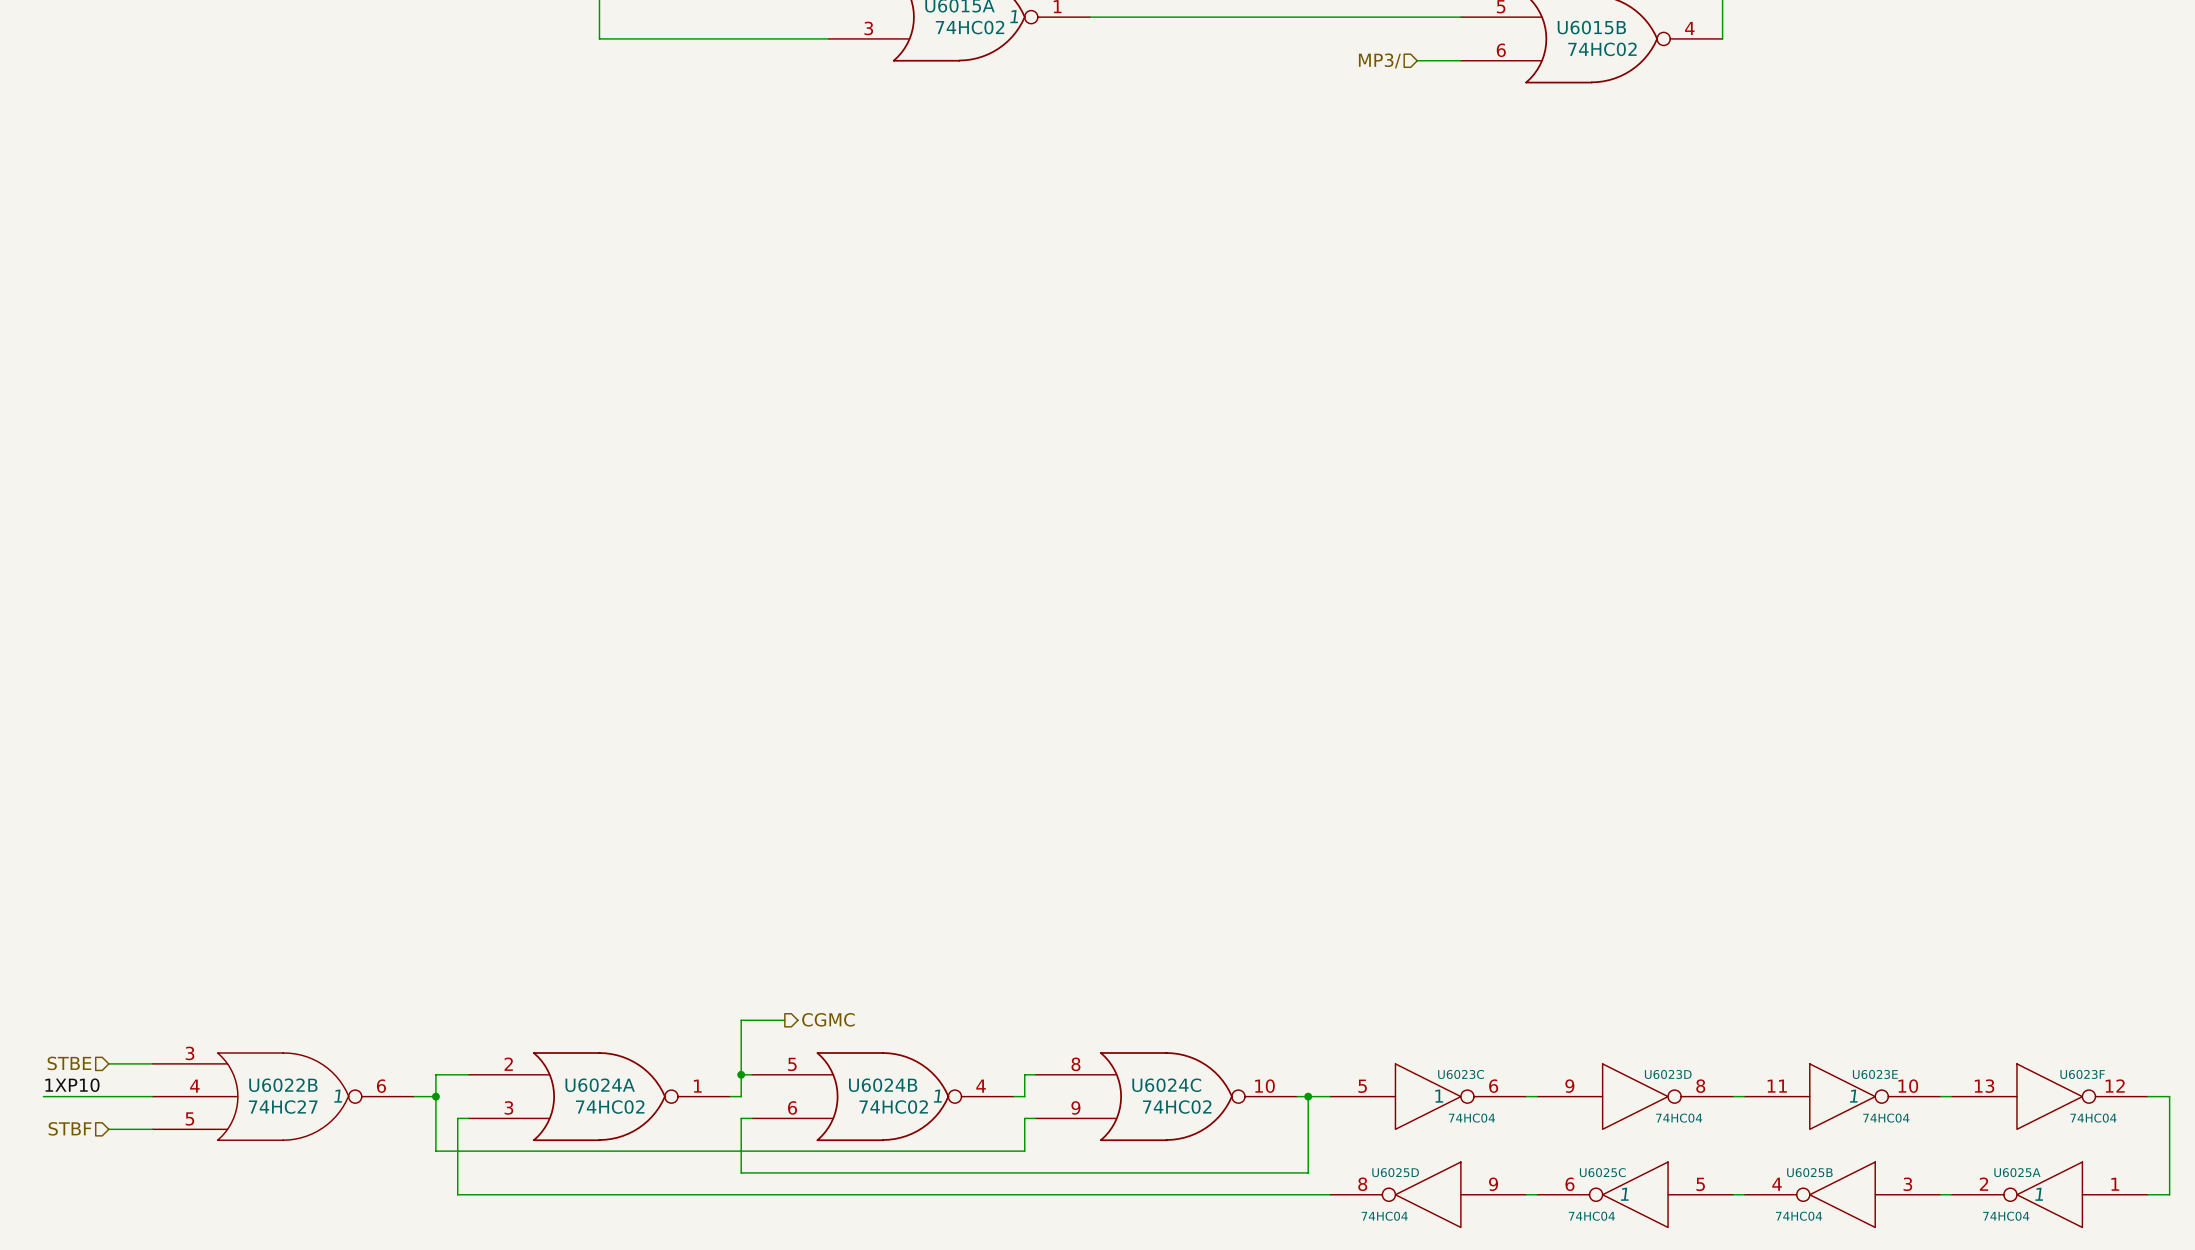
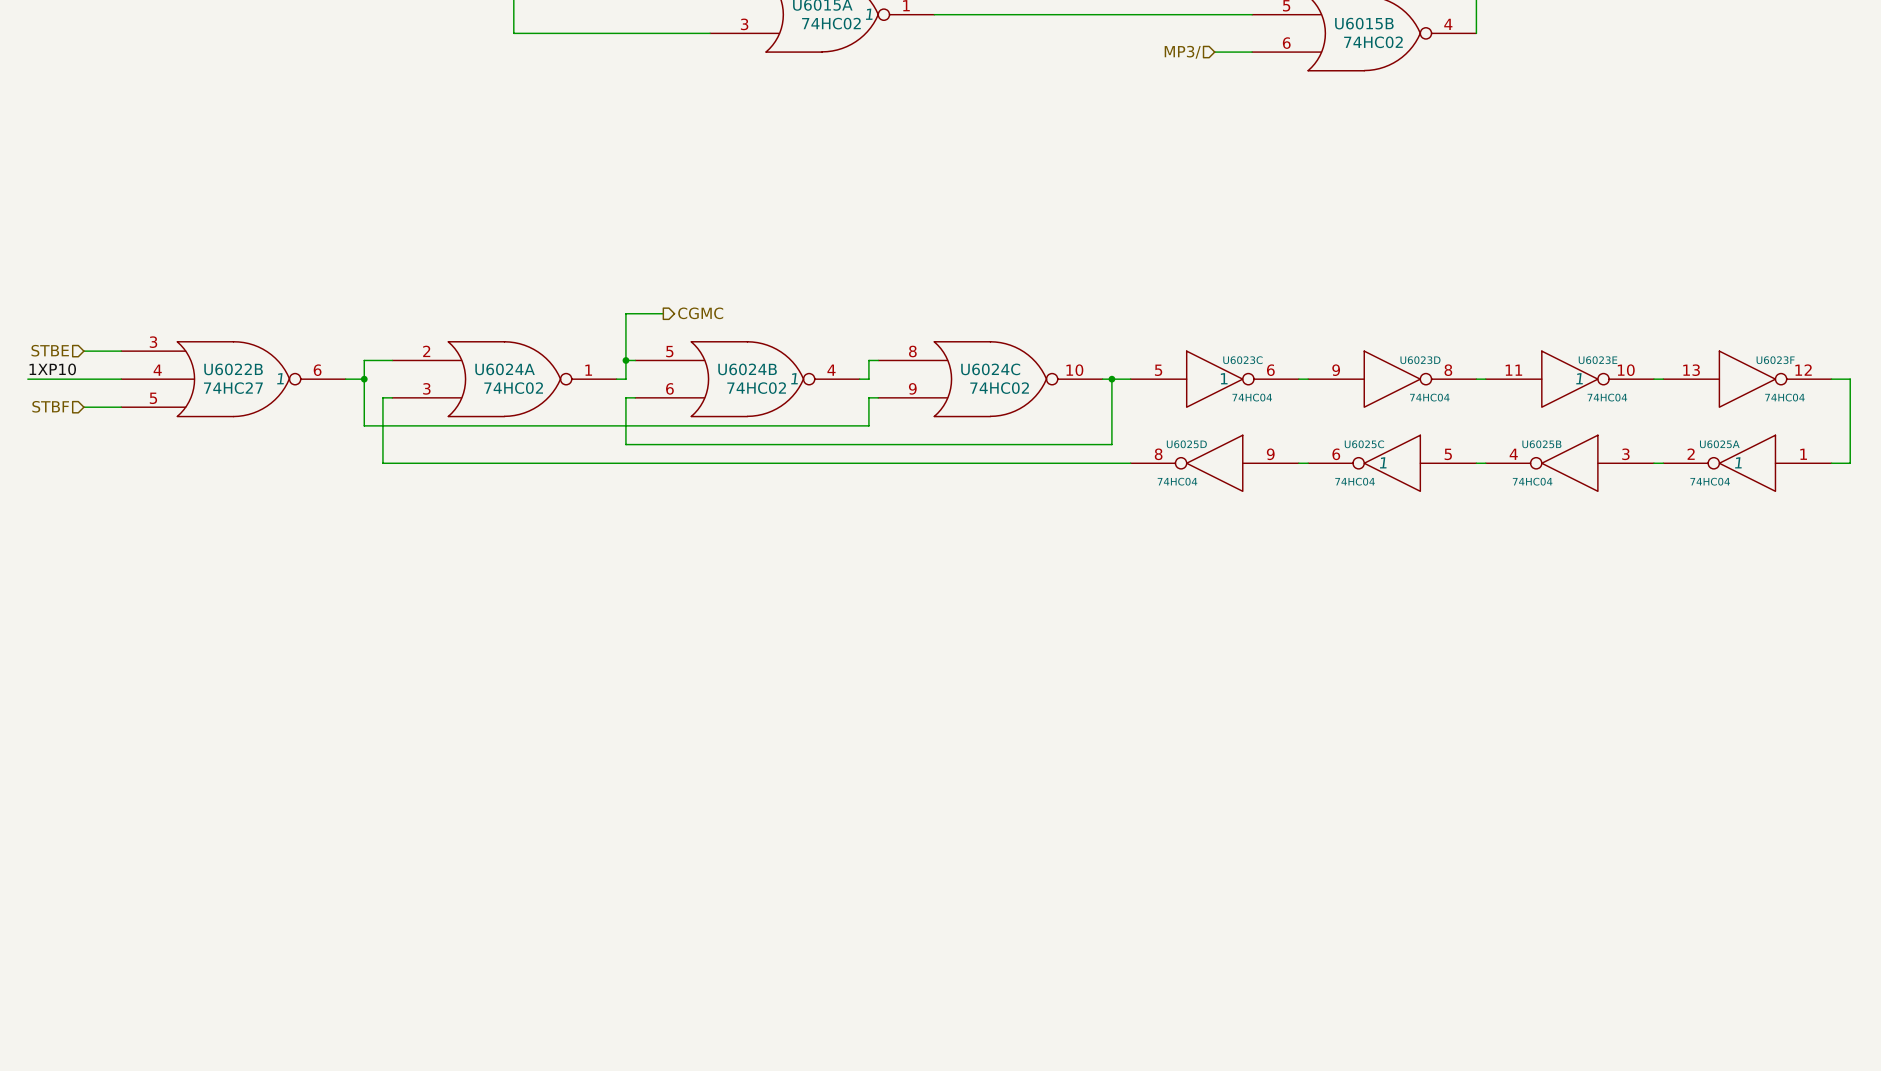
hierarchical label: none -> CGMC (700, 313)
wire: none -> (663, 313) (625, 313) (625, 379) (616, 379)
hierarchical label: none -> STBE (50, 350)
wire: none -> (83, 351) (121, 351)
wire: none -> (392, 360) (364, 360) (364, 425) (868, 425) (868, 397) (878, 397)
wire: none -> (625, 360) (635, 360)
junction: none -> (625, 360)
wire: none -> (878, 360) (868, 360) (868, 379) (859, 379)
label: none -> 1XP10 (52, 369)
wire: none -> (27, 379) (121, 379)
wire: none -> (345, 379) (364, 379)
junction: none -> (364, 379)
wire: none -> (1102, 379) (1130, 379)
wire: none -> (1111, 379) (1111, 444) (625, 444) (625, 397) (635, 397)
junction: none -> (1111, 379)
wire: none -> (1298, 379) (1308, 379)
wire: none -> (1476, 379) (1485, 379)
wire: none -> (1653, 379) (1663, 379)
wire: none -> (1831, 379) (1850, 379) (1850, 463) (1831, 463)
wire: none -> (392, 397) (382, 397) (382, 463) (1130, 463)
hierarchical label: none -> STBF (50, 406)
wire: none -> (83, 407) (121, 407)
wire: none -> (1298, 463) (1308, 463)
wire: none -> (1476, 463) (1485, 463)
wire: none -> (1653, 463) (1663, 463)
hierarchical label: CGMC (828, 1019) -> none
wire: (784, 1020) (741, 1020) (741, 1096) (730, 1096) -> none
hierarchical label: STBE (69, 1063) -> none
wire: (108, 1063) (152, 1063) -> none
wire: (468, 1074) (435, 1074) (435, 1151) (1024, 1151) (1024, 1118) (1035, 1118) -> none
wire: (741, 1074) (752, 1074) -> none
junction: (741, 1074) -> none
wire: (1035, 1074) (1024, 1074) (1024, 1096) (1013, 1096) -> none
label: 1XP10 (72, 1085) -> none
wire: (43, 1096) (152, 1096) -> none
U6022B position: (283, 1096) -> (233, 379)
wire: (414, 1096) (435, 1096) -> none
junction: (435, 1096) -> none
U6024A position: (599, 1096) -> (504, 379)
U6024B position: (882, 1096) -> (747, 379)
U6024C position: (1166, 1096) -> (990, 379)
wire: (1297, 1096) (1330, 1096) -> none
wire: (1308, 1096) (1308, 1172) (741, 1172) (741, 1118) (752, 1118) -> none
junction: (1308, 1096) -> none
U6023C position: (1428, 1096) -> (1214, 379)
wire: (1526, 1096) (1537, 1096) -> none
U6023D position: (1635, 1096) -> (1392, 379)
wire: (1733, 1096) (1744, 1096) -> none
U6023E position: (1842, 1096) -> (1569, 379)
wire: (1940, 1096) (1951, 1096) -> none
U6023F position: (2049, 1096) -> (1747, 379)
wire: (2147, 1096) (2169, 1096) (2169, 1194) (2147, 1194) -> none
wire: (468, 1118) (457, 1118) (457, 1194) (1330, 1194) -> none
hierarchical label: STBF (70, 1128) -> none
wire: (108, 1129) (152, 1129) -> none
U6025D position: (1428, 1194) -> (1214, 463)
wire: (1526, 1194) (1537, 1194) -> none
U6025C position: (1635, 1194) -> (1392, 463)
wire: (1733, 1194) (1744, 1194) -> none
U6025B position: (1842, 1194) -> (1569, 463)
wire: (1940, 1194) (1951, 1194) -> none
U6025A position: (2049, 1194) -> (1747, 463)

